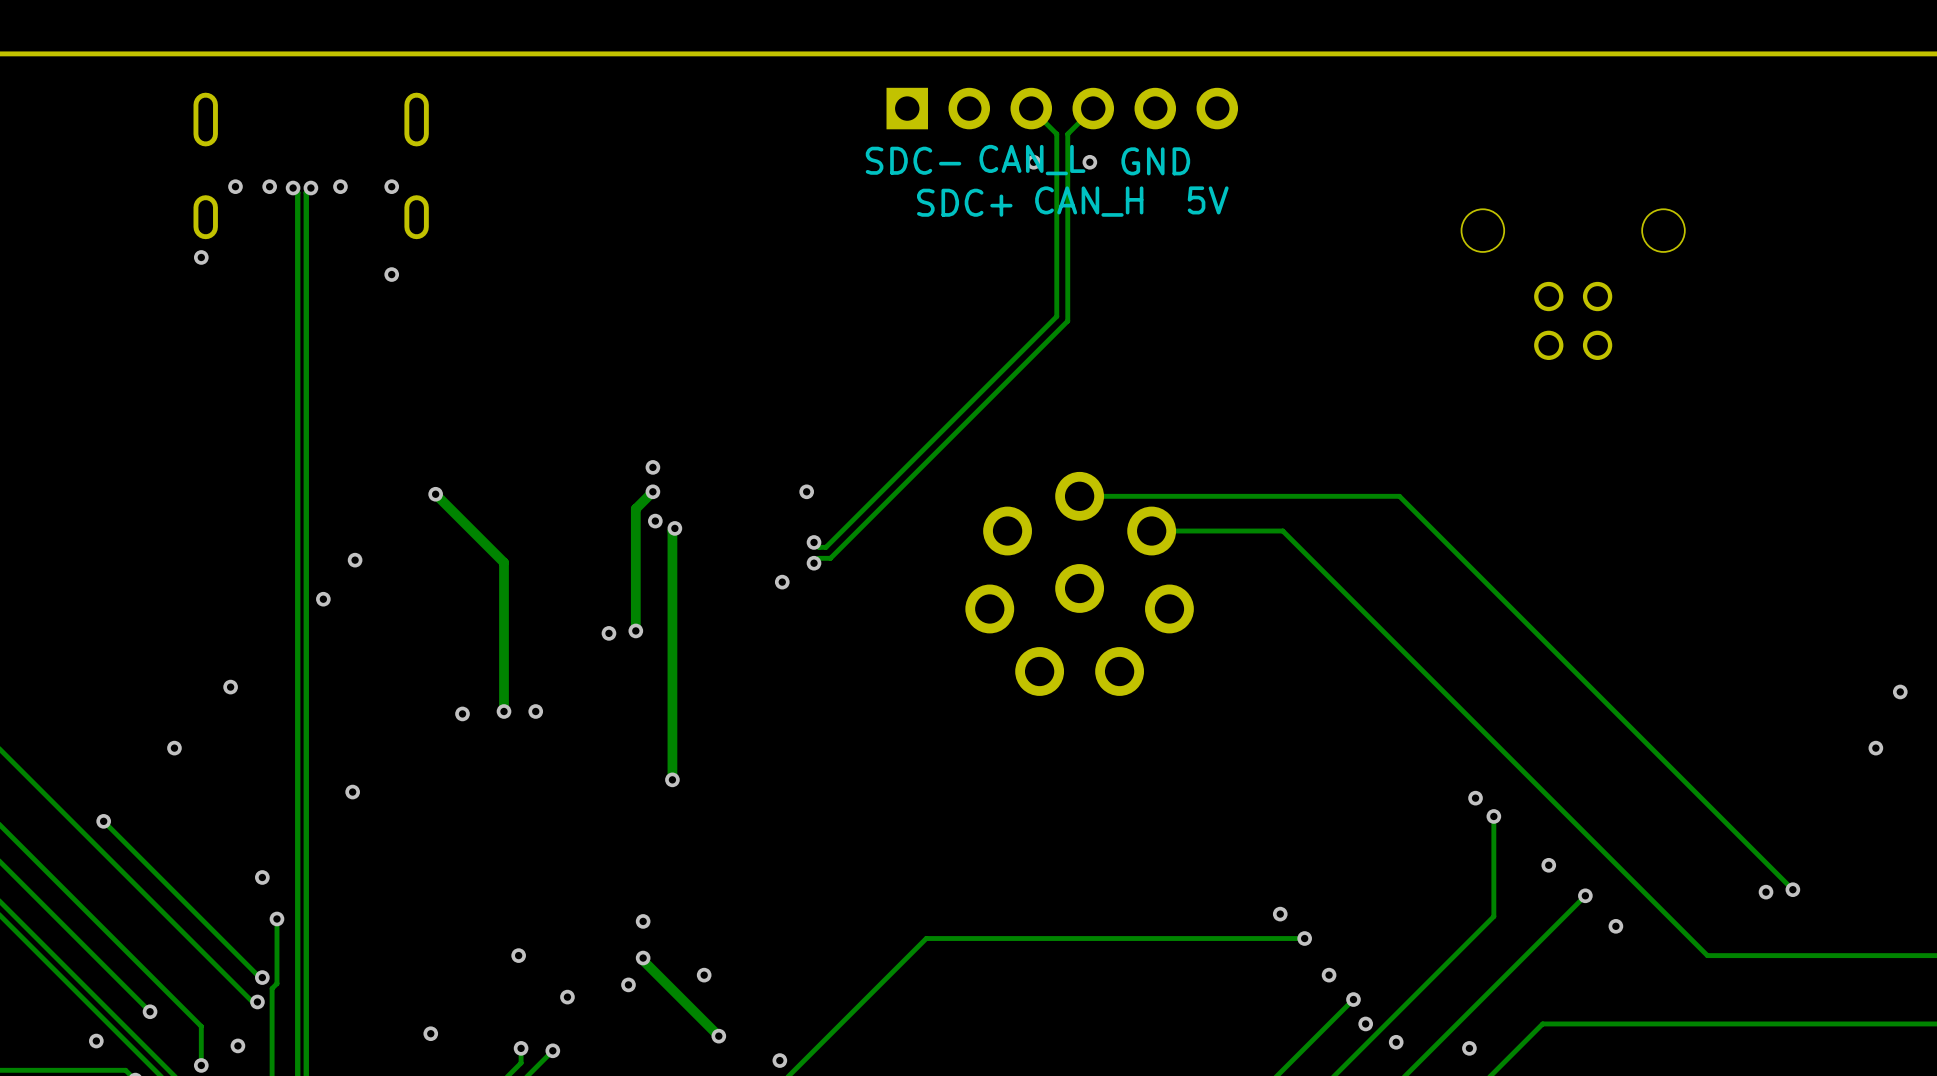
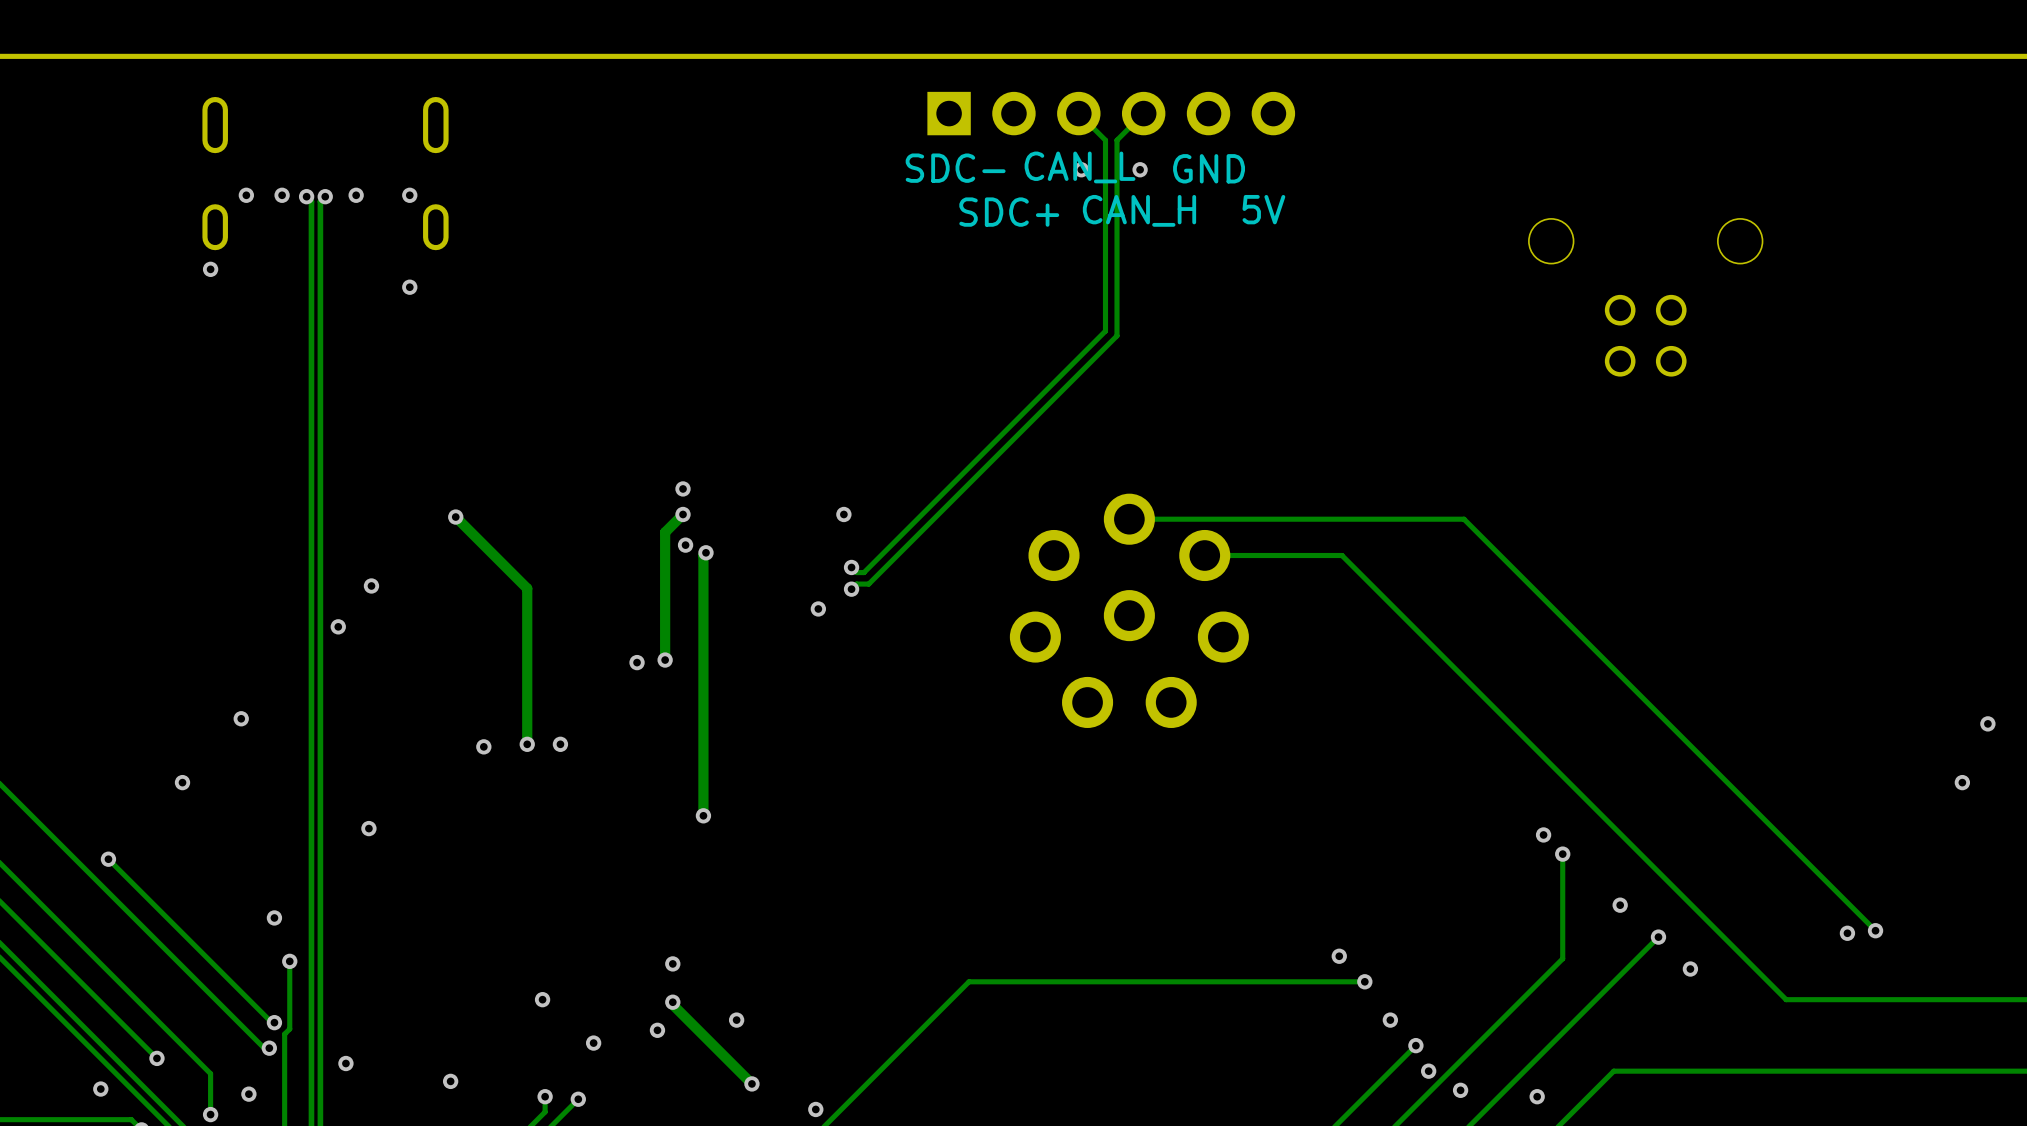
via: none -> (345, 1063)

